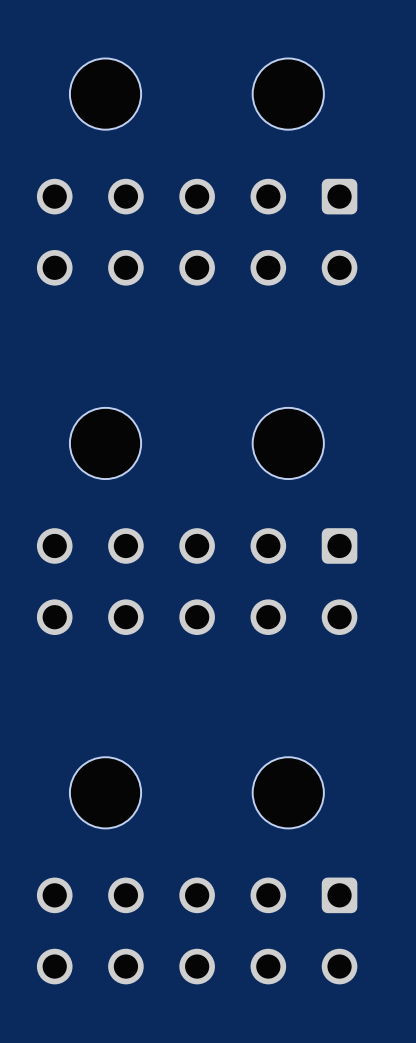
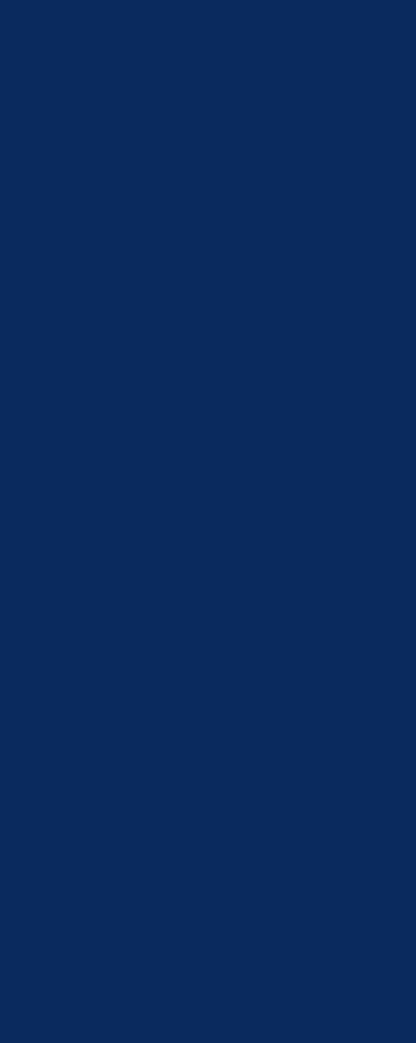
part: (197, 172) -> none
part: (197, 521) -> none
part: (197, 870) -> none

